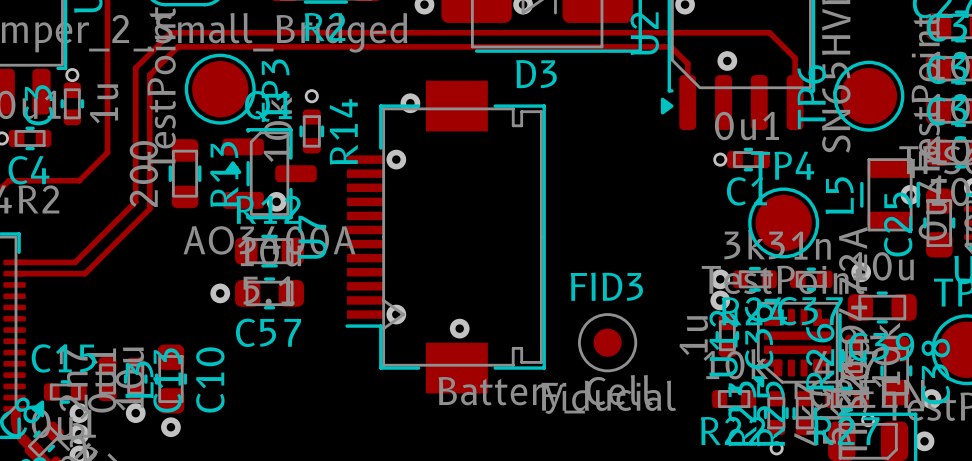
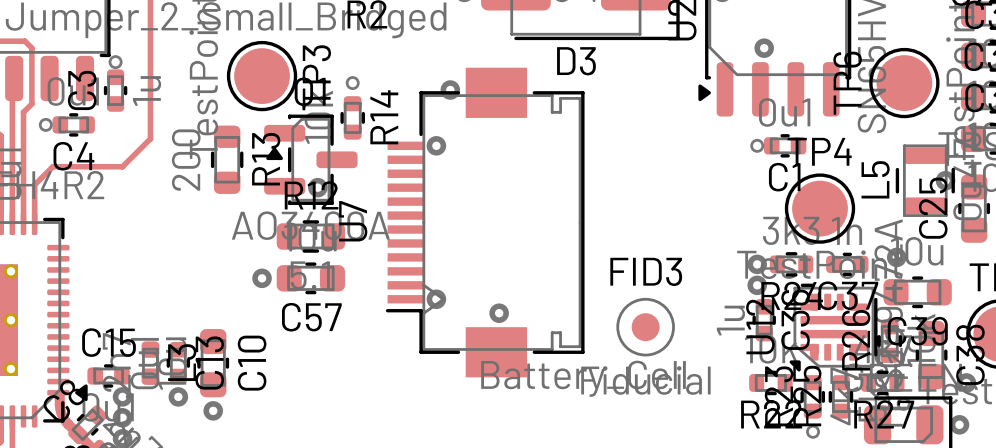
top track: (687, 102) (687, 63) (670, 46) (177, 46) (149, 75) (149, 208) (85, 273) (14, 273) -> none
top track: (795, 102) (795, 58) (769, 32) (170, 32) (135, 68) (135, 201) (75, 262) (14, 262) -> none

